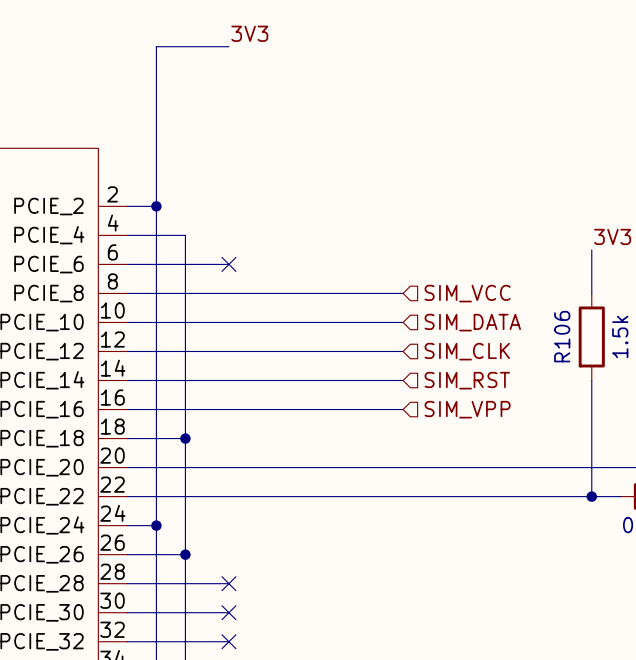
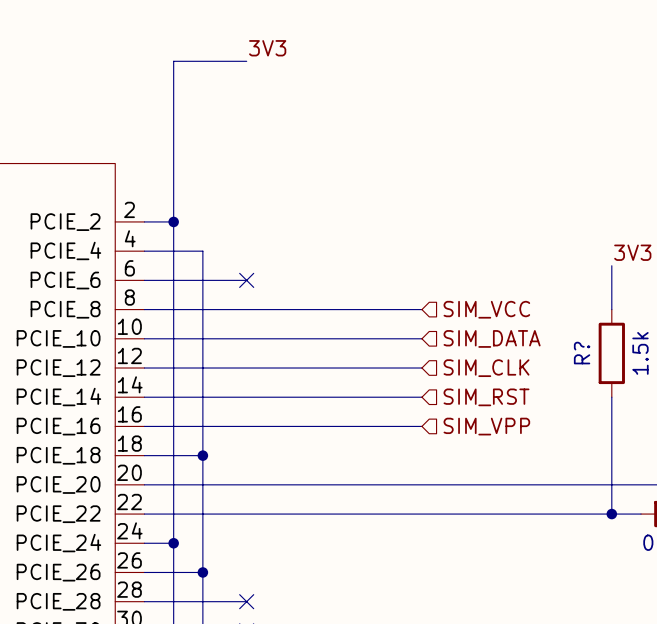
R106 name: R106 (562, 336) -> R? (582, 353)

